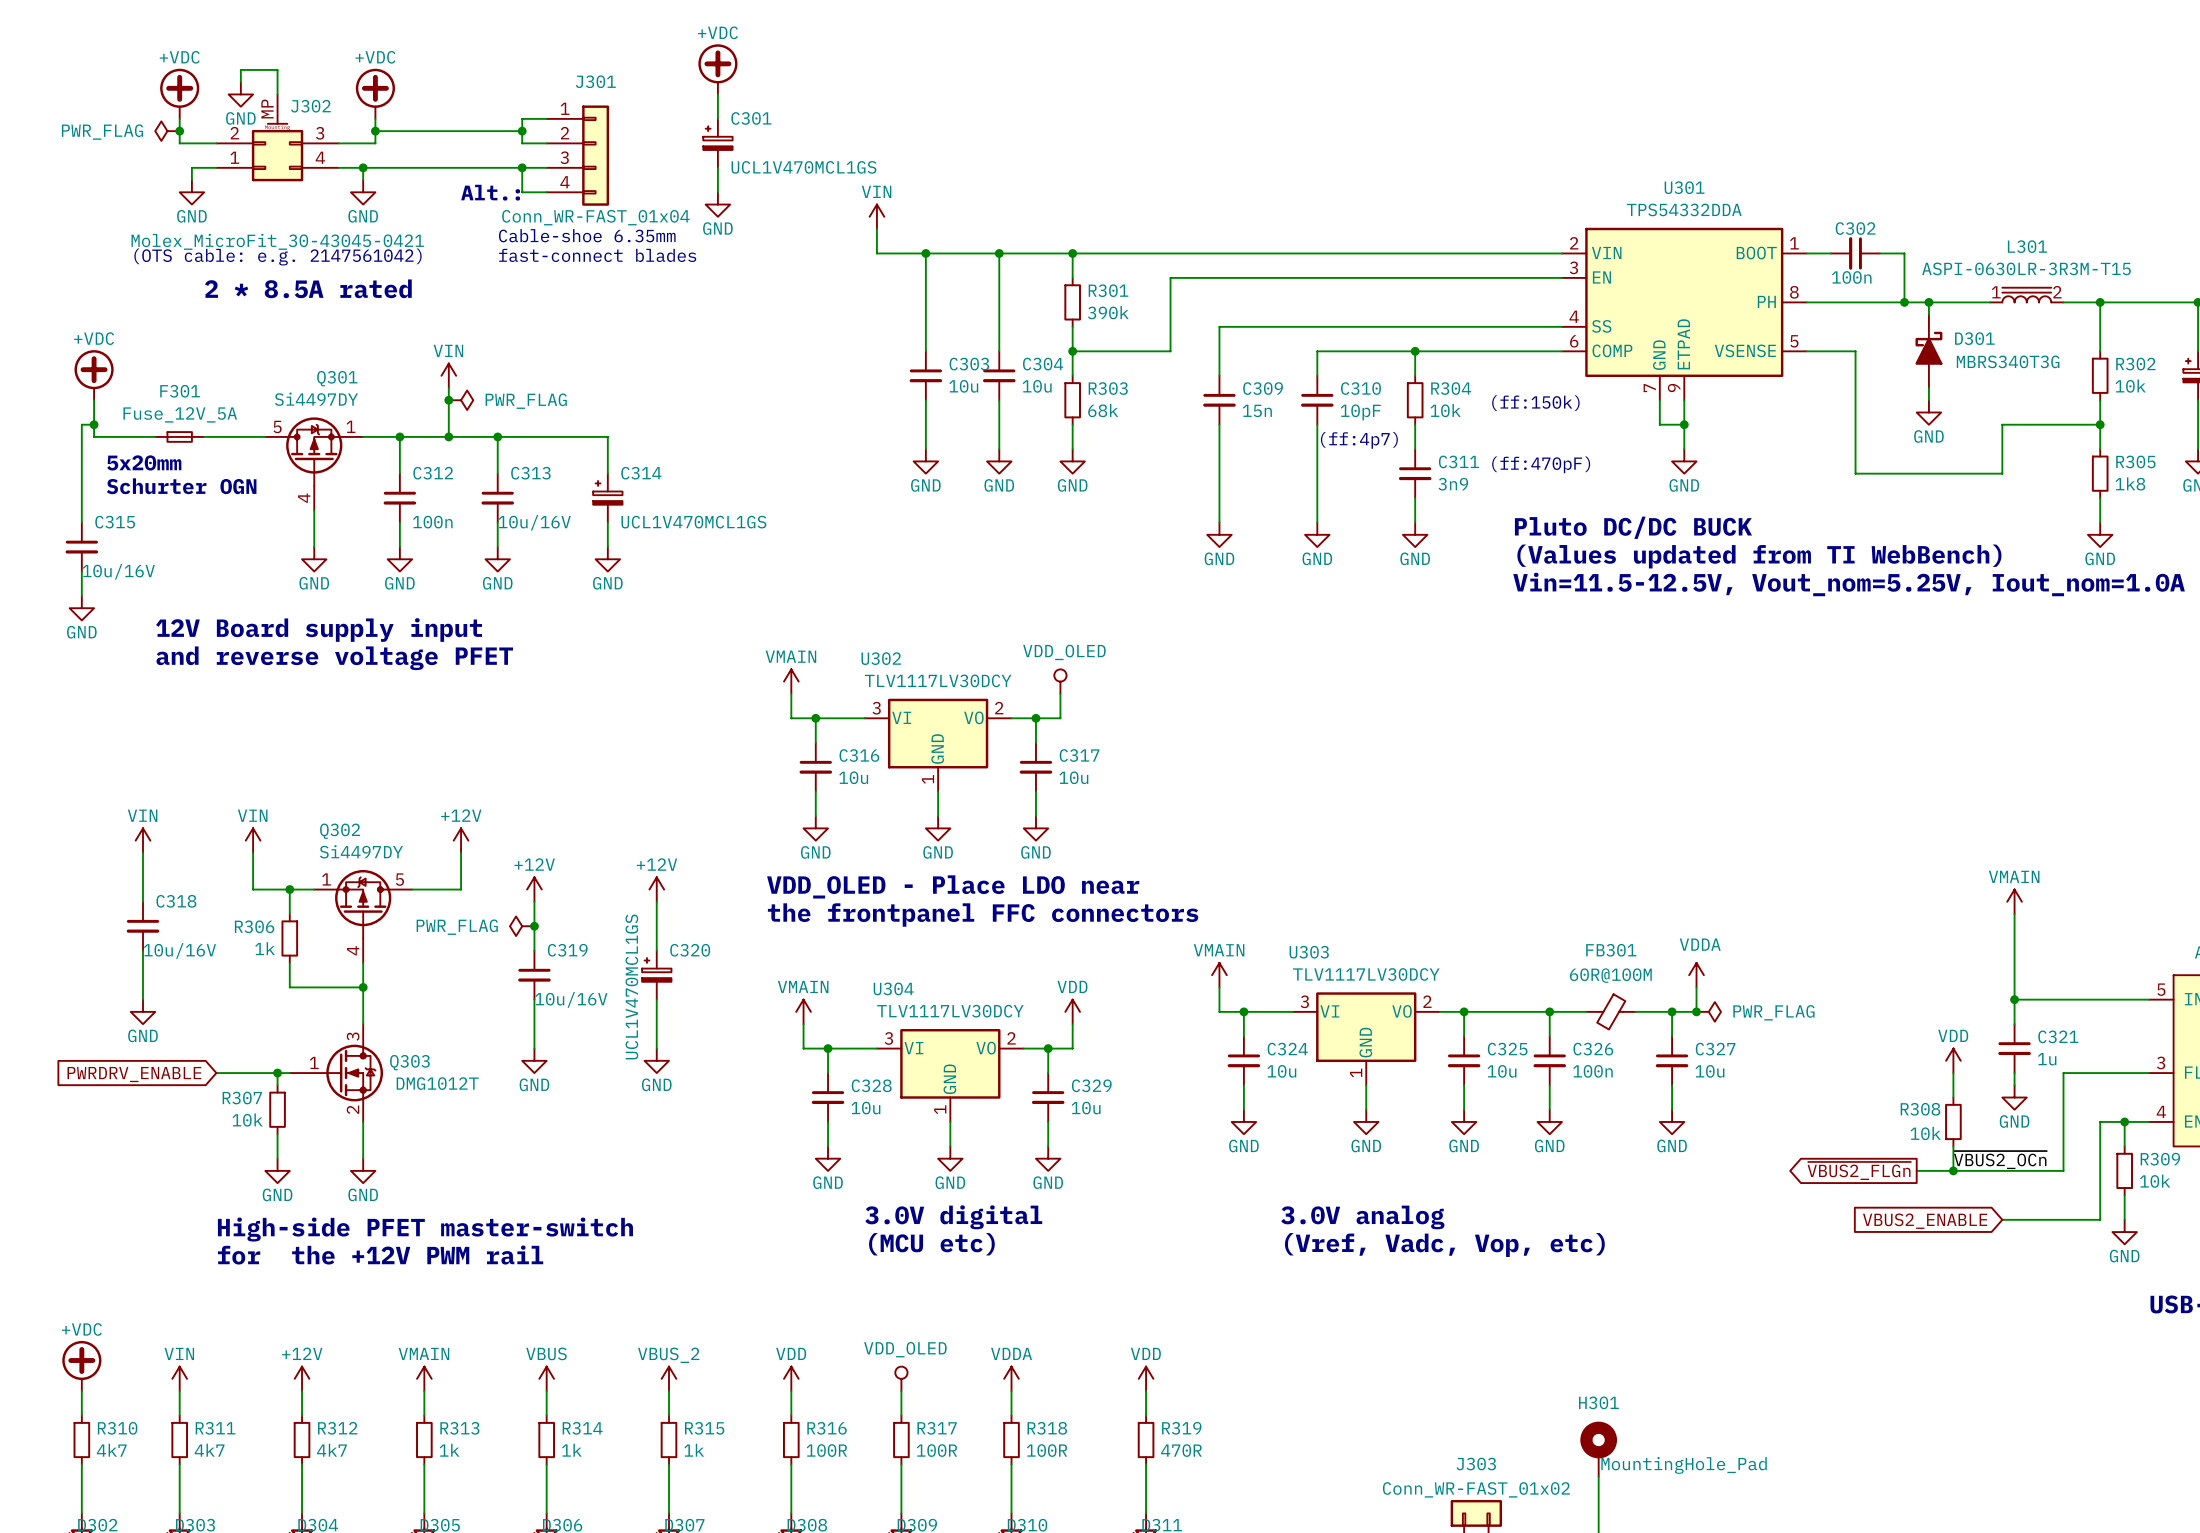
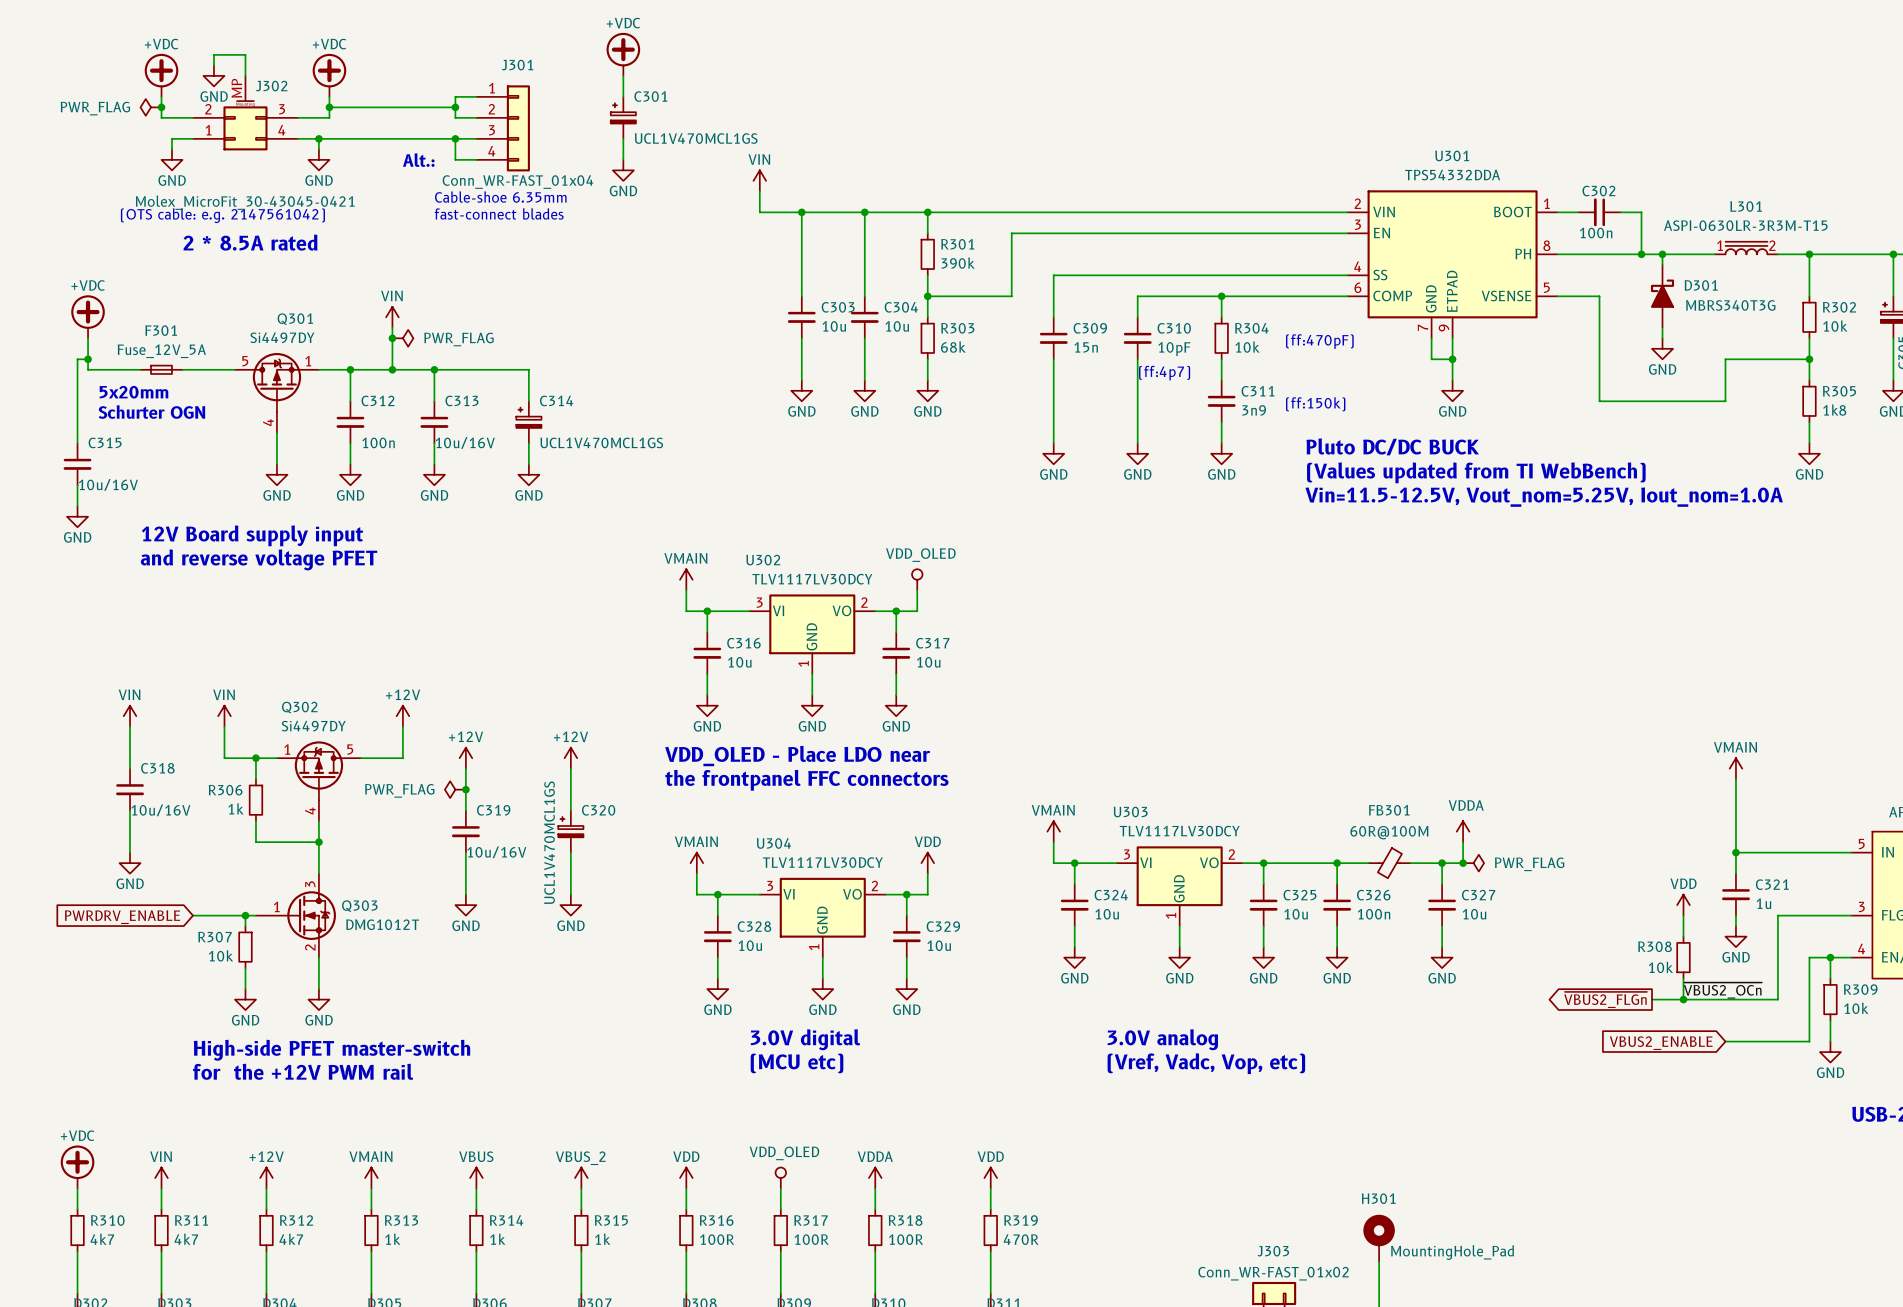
text: (ff:150k) (1535, 403) -> (ff:470pF) (1319, 341)
text: (ff:470pF) (1541, 464) -> (ff:150k) (1315, 404)

